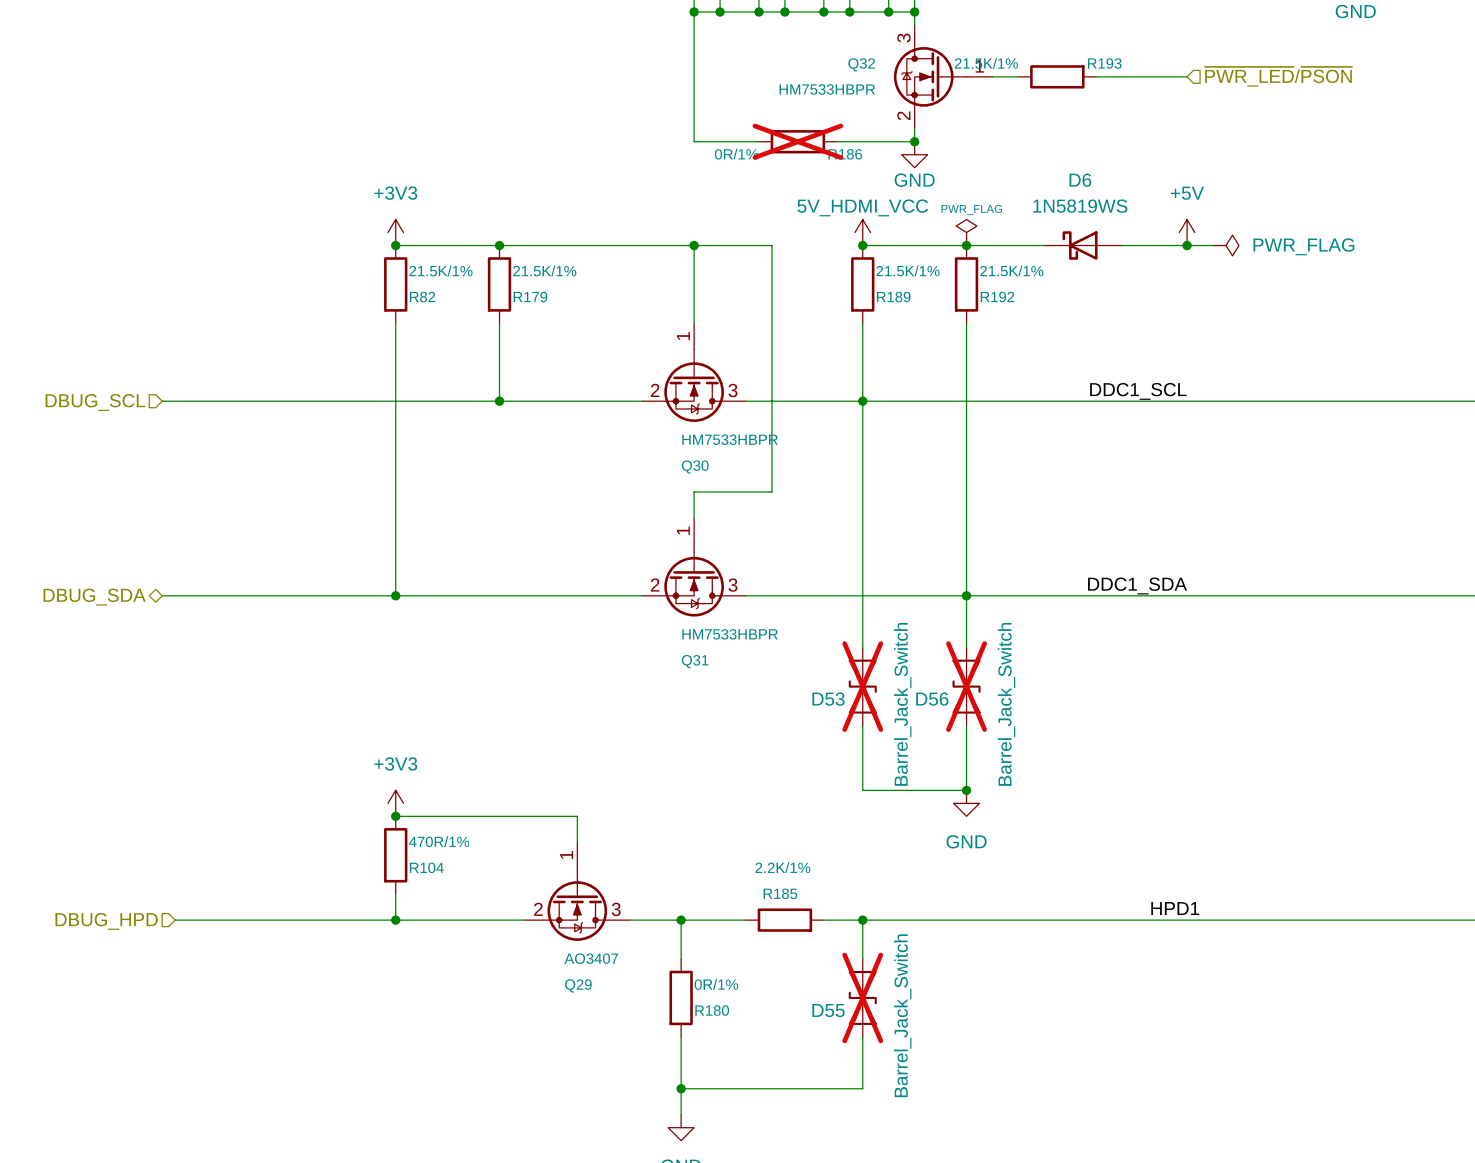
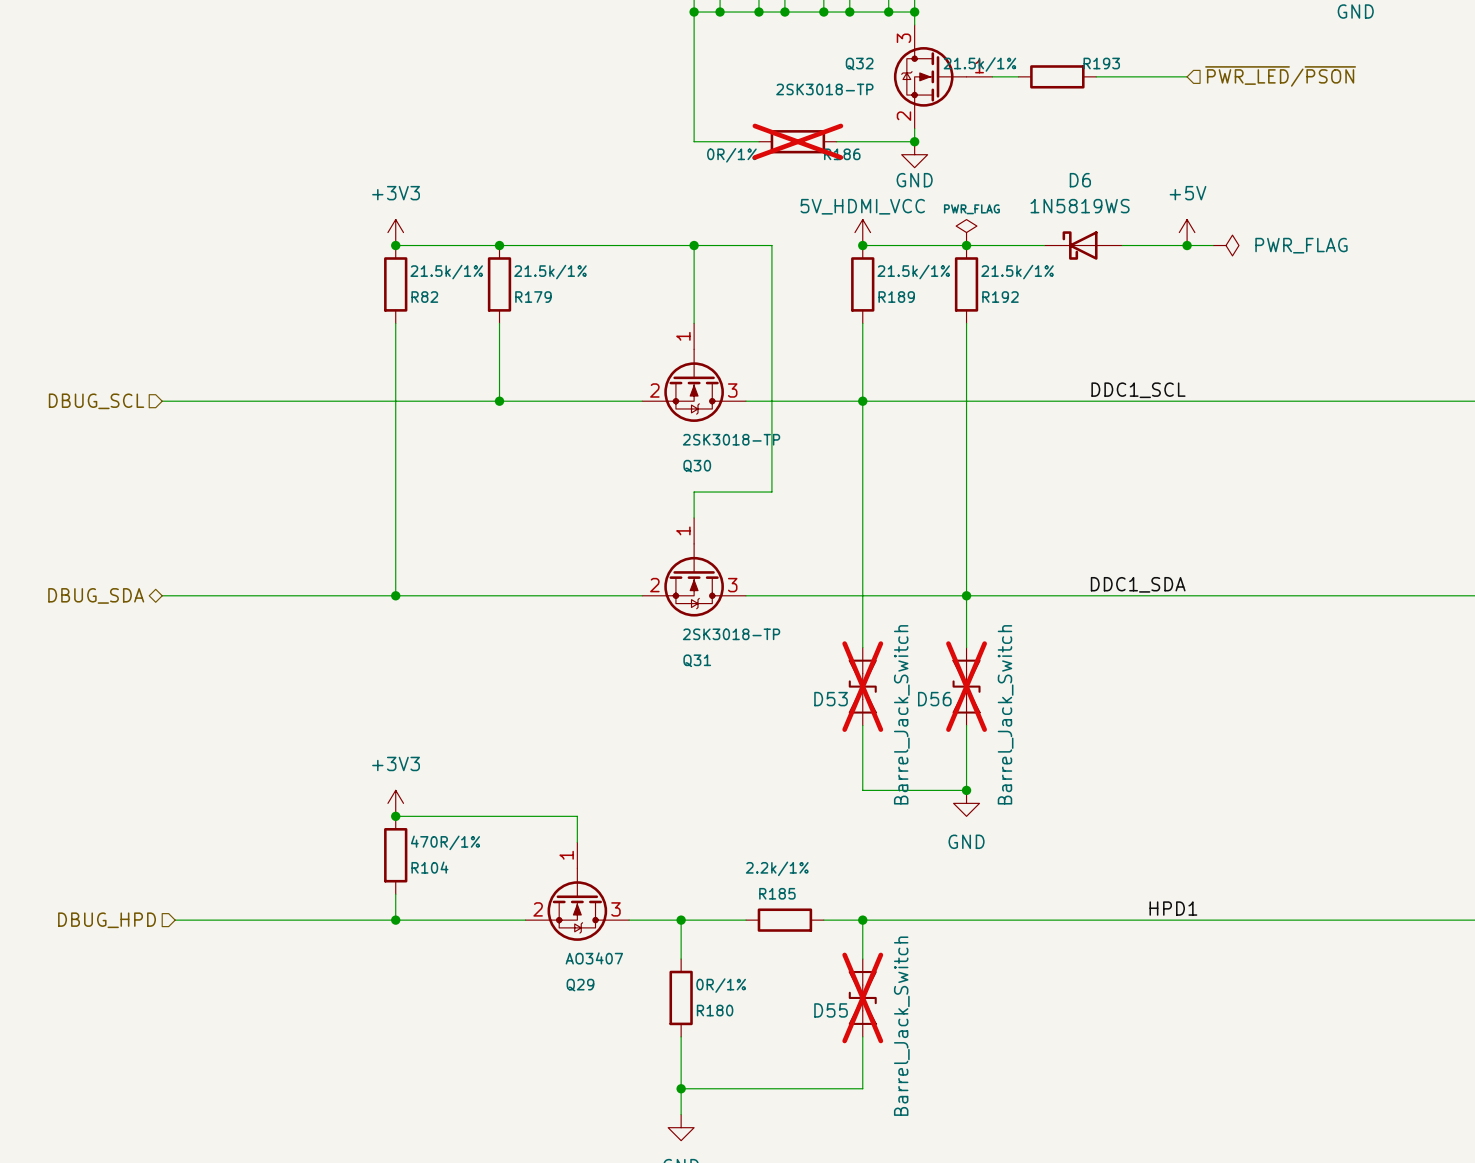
R193 value: 21.5K/1% (986, 63) -> 21.5k/1% (979, 64)
Q32 value: HM7533HBPR (827, 89) -> 2SK3018-TP (824, 89)
R82 value: 21.5K/1% (441, 270) -> 21.5k/1% (446, 272)
R179 value: 21.5K/1% (544, 270) -> 21.5k/1% (550, 272)
R189 value: 21.5K/1% (908, 270) -> 21.5k/1% (913, 272)
R192 value: 21.5K/1% (1011, 270) -> 21.5k/1% (1017, 272)
Q30 value: HM7533HBPR (730, 439) -> 2SK3018-TP (731, 439)
Q31 value: HM7533HBPR (730, 634) -> 2SK3018-TP (731, 634)
R185 value: 2.2K/1% (782, 867) -> 2.2k/1% (777, 868)

